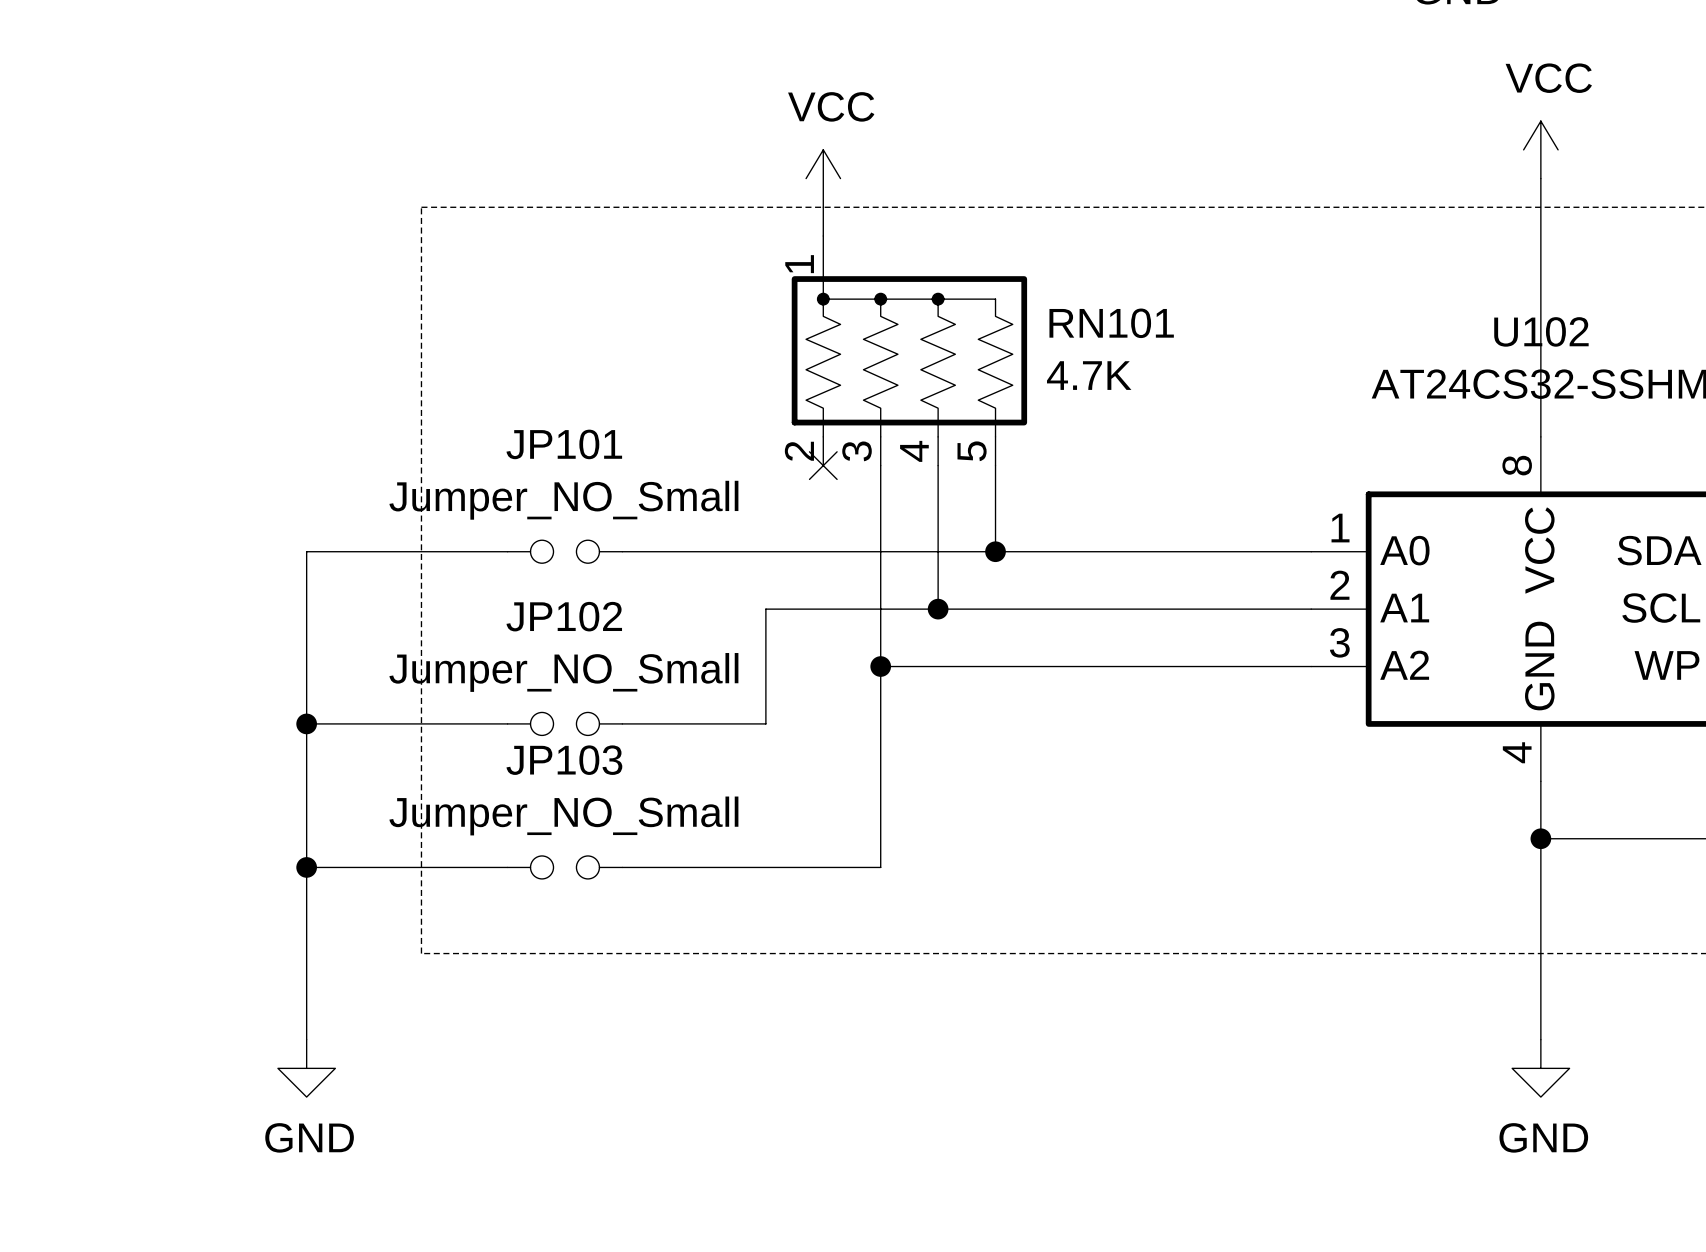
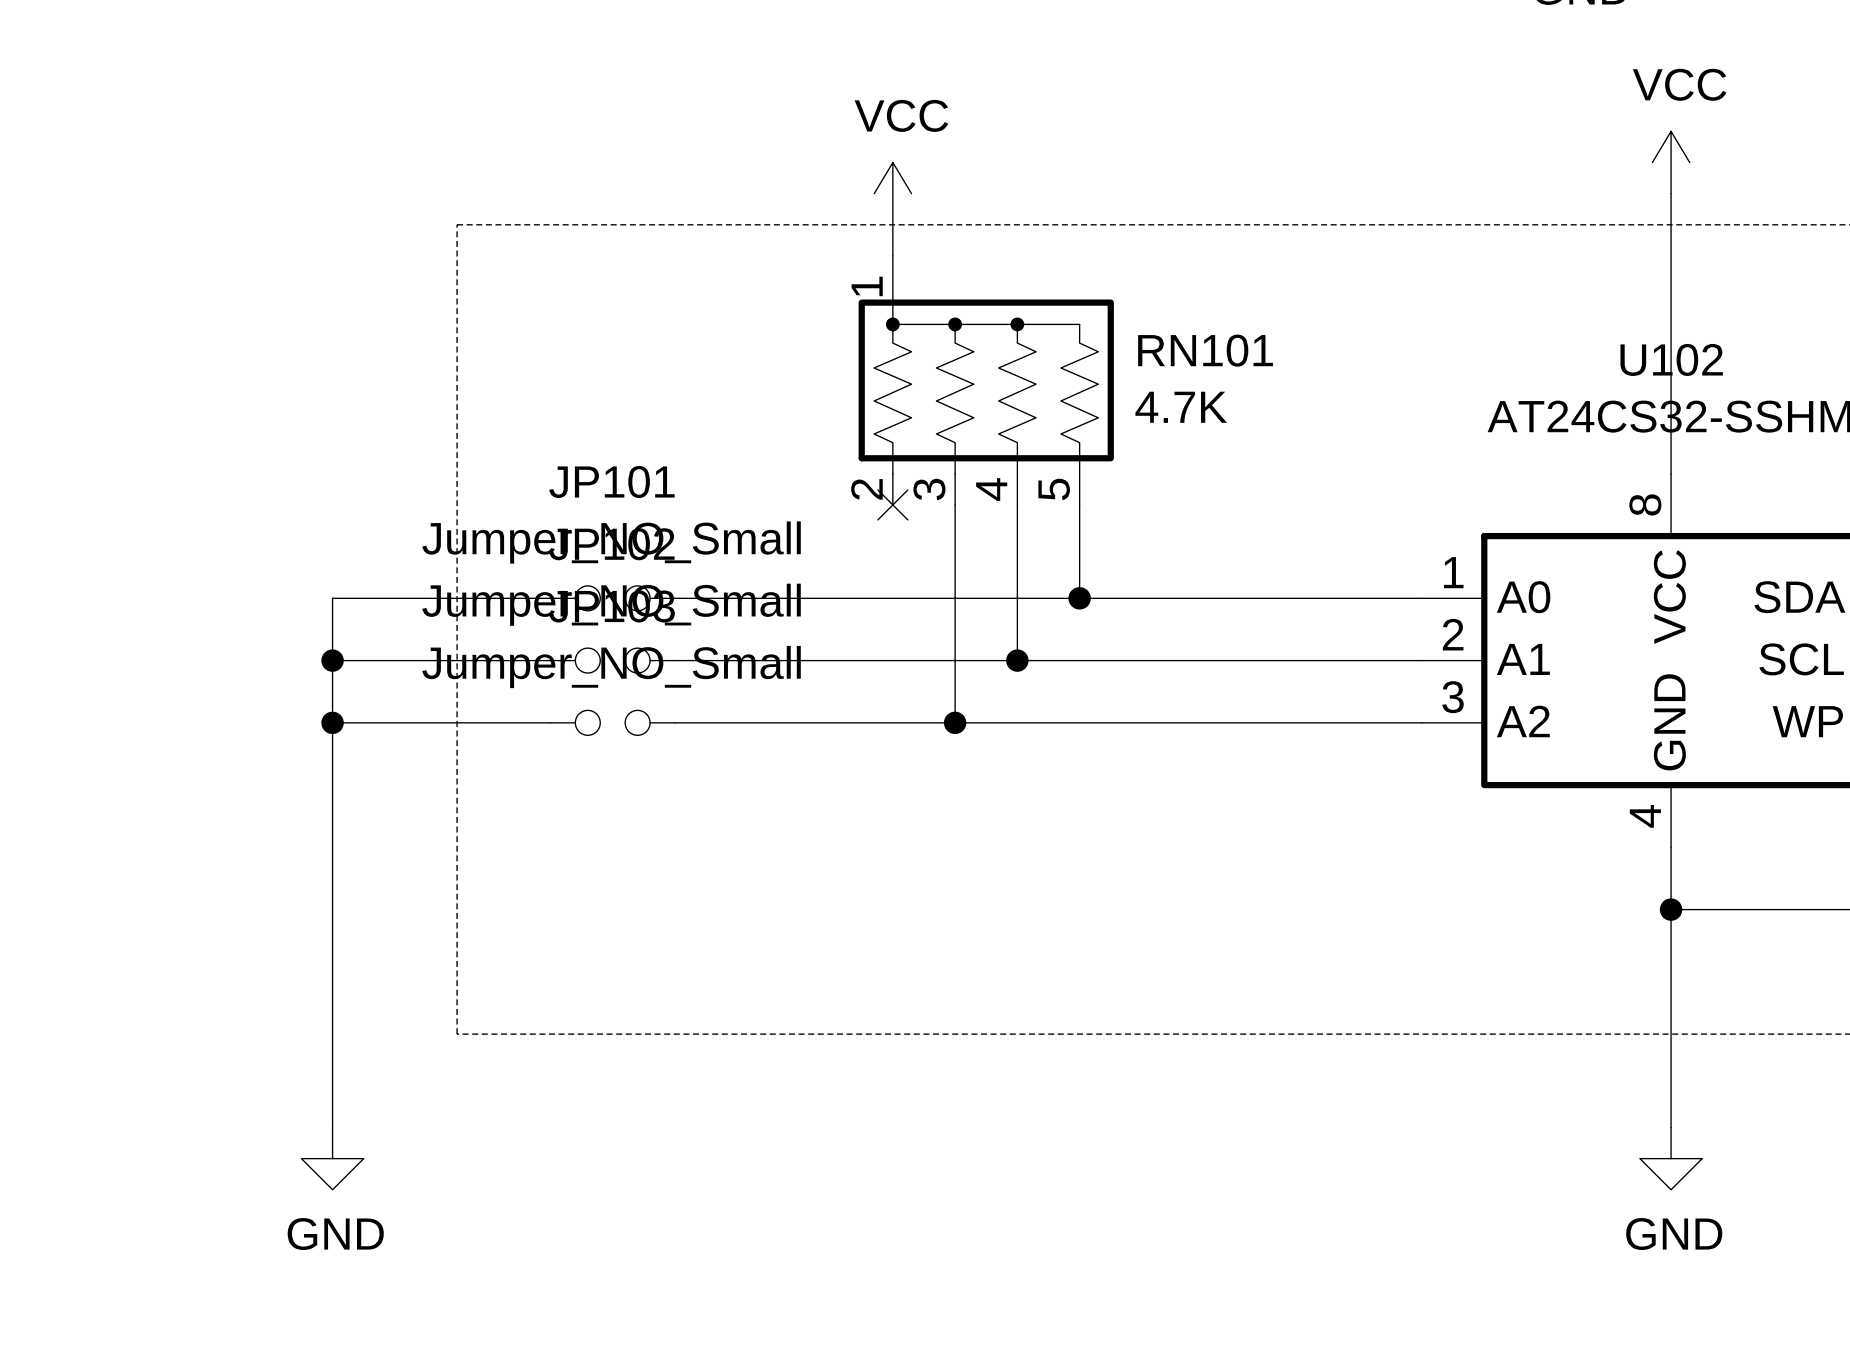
junction: none -> (332, 660)
wire: (765, 609) (765, 723) (622, 723) -> (830, 660) (674, 660)
junction: none -> (332, 722)
wire: (880, 666) (880, 867) (622, 867) -> (955, 722) (674, 722)
wire: (306, 723) (507, 723) -> (332, 722) (550, 722)
junction: (306, 723) -> none
JP102 position: (564, 723) -> (612, 660)
wire: (306, 867) (507, 867) -> (332, 660) (550, 660)
junction: (306, 867) -> none
JP103 position: (564, 867) -> (612, 722)

